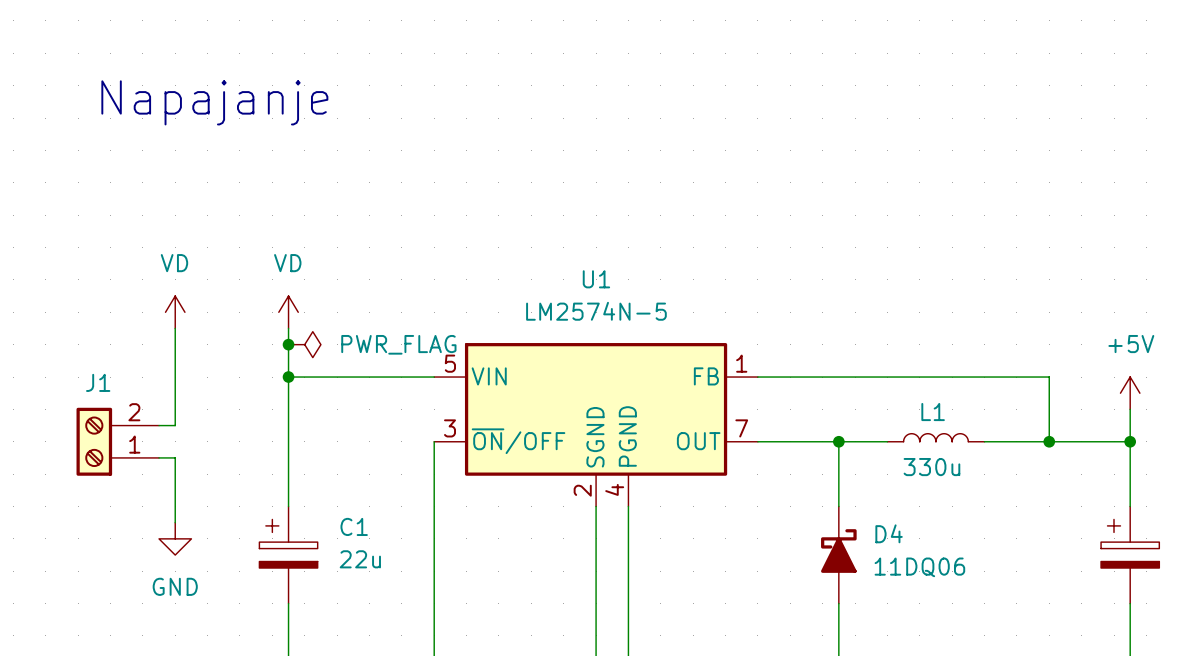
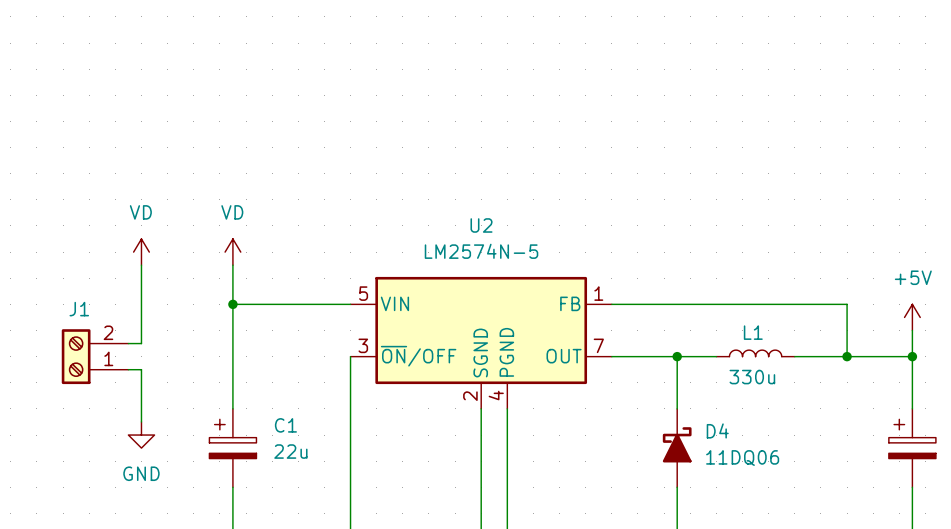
text: Napajanje (214, 102) -> none
U1 name: U1 (596, 279) -> U2 (481, 225)
junction: (288, 344) -> none
power symbol: PWR_FLAG (304, 344) -> none

